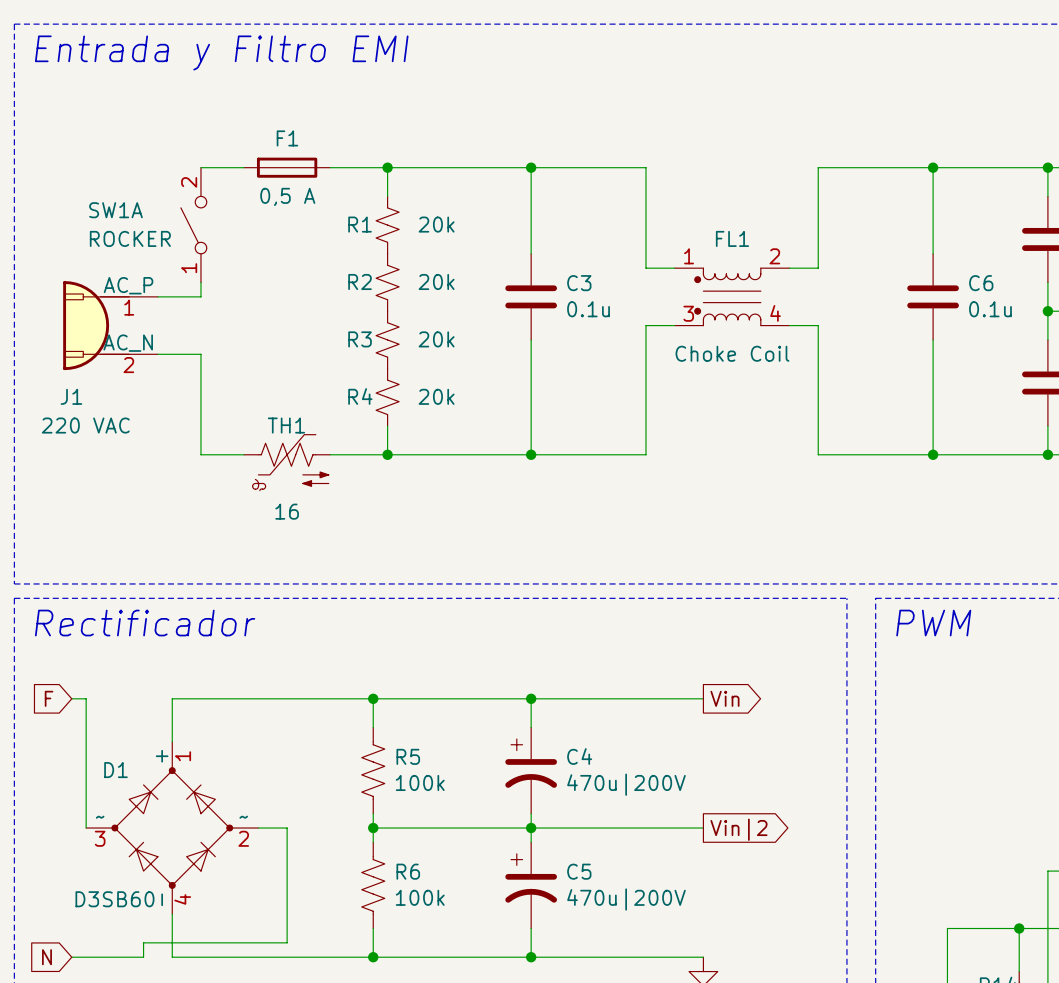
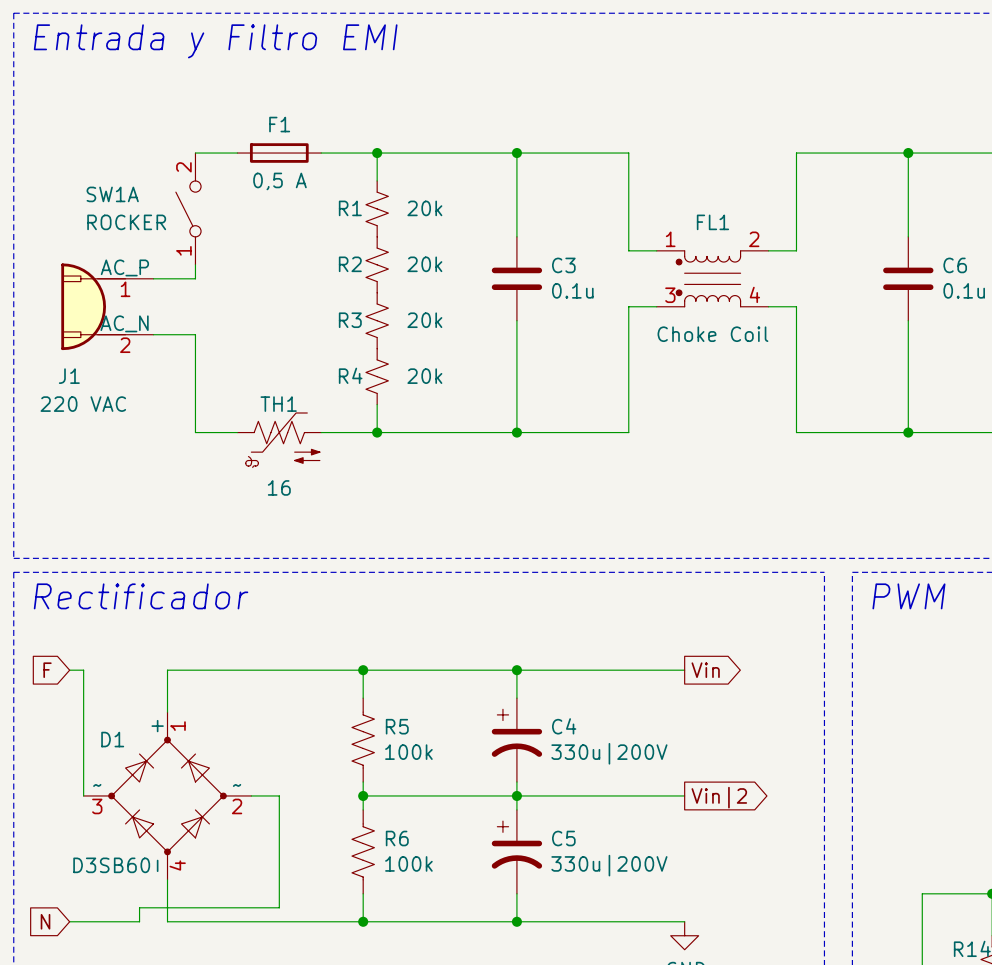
C4 value: 470u|200V (626, 784) -> 330u|200V (609, 753)
C5 value: 470u|200V (626, 899) -> 330u|200V (609, 865)

